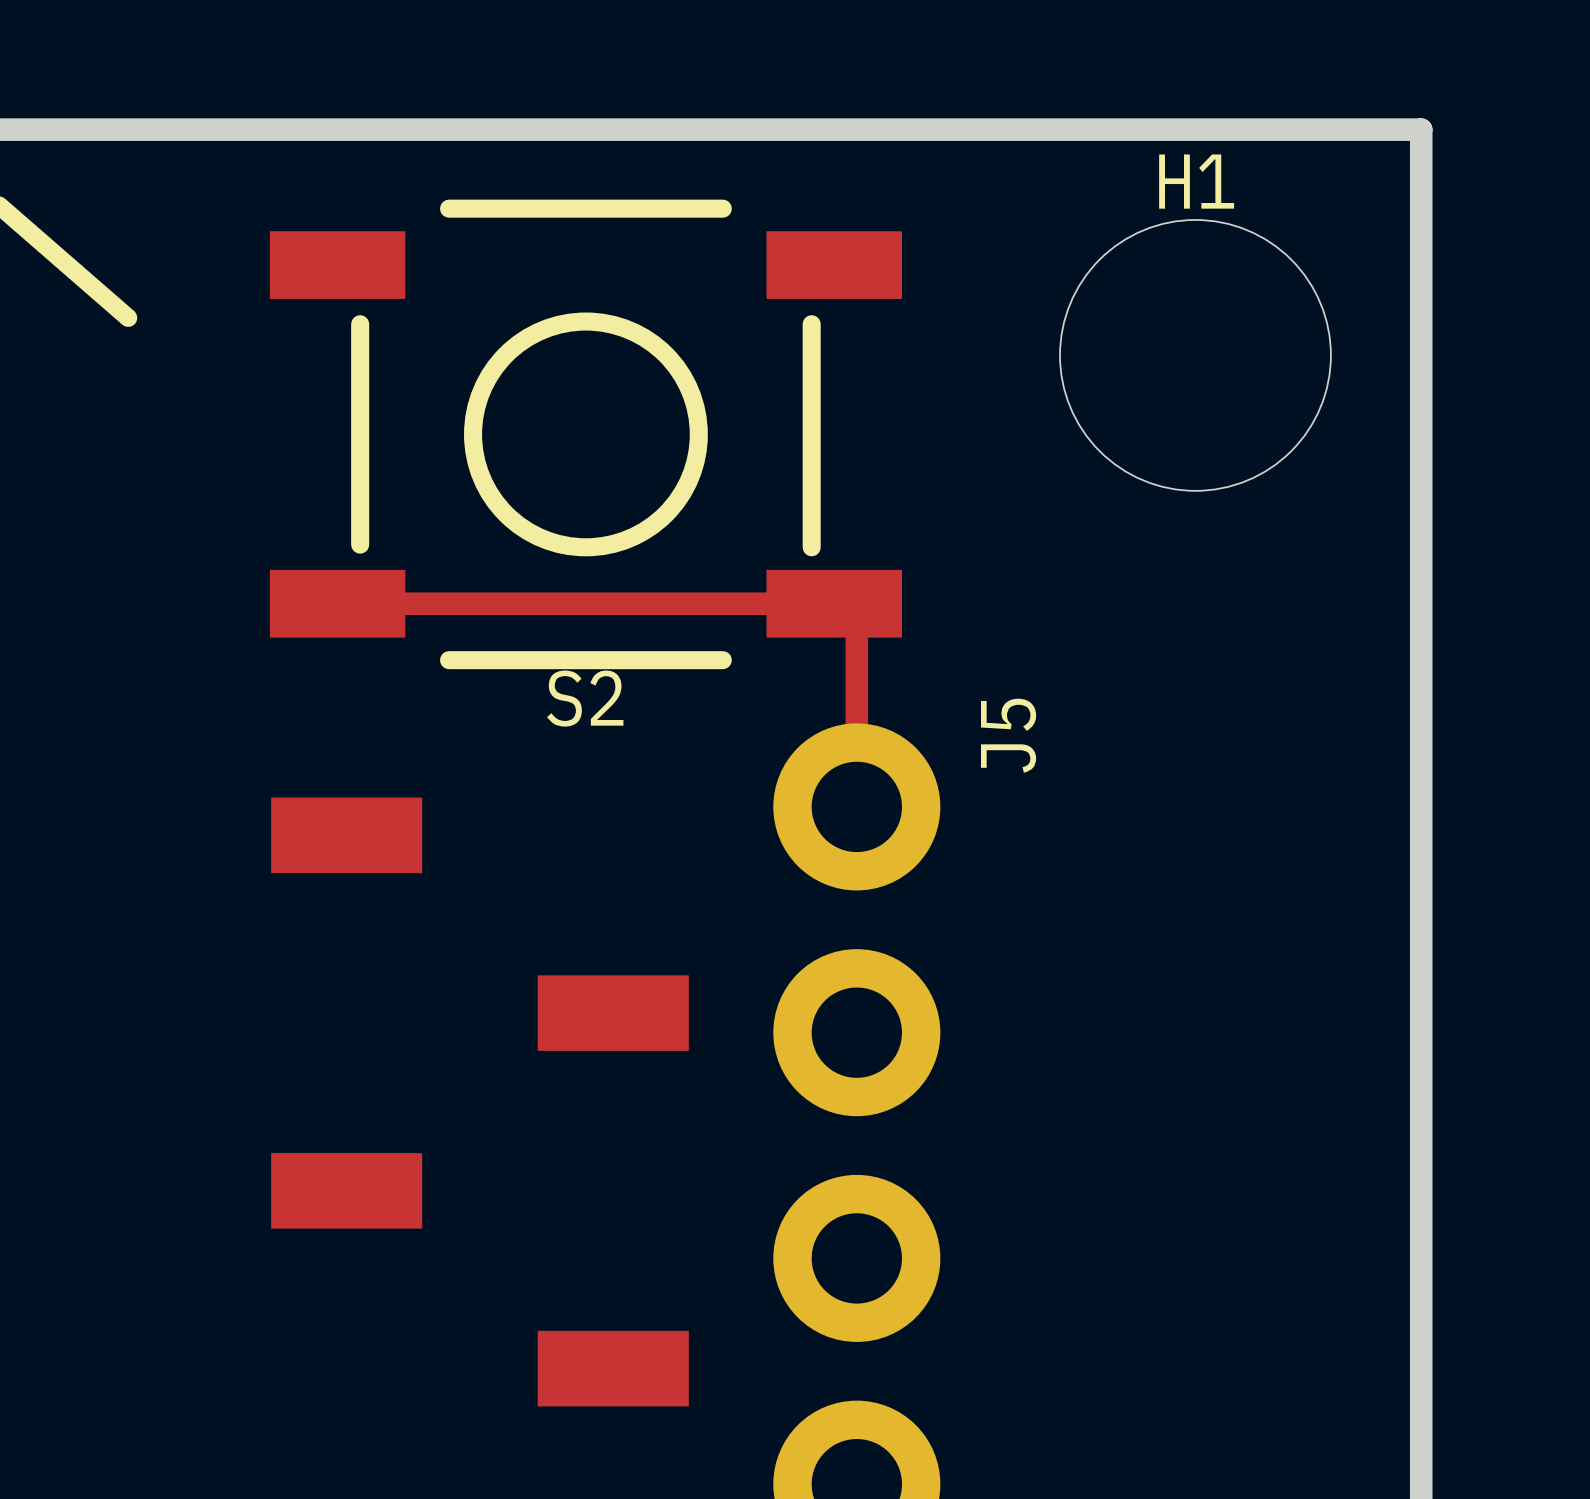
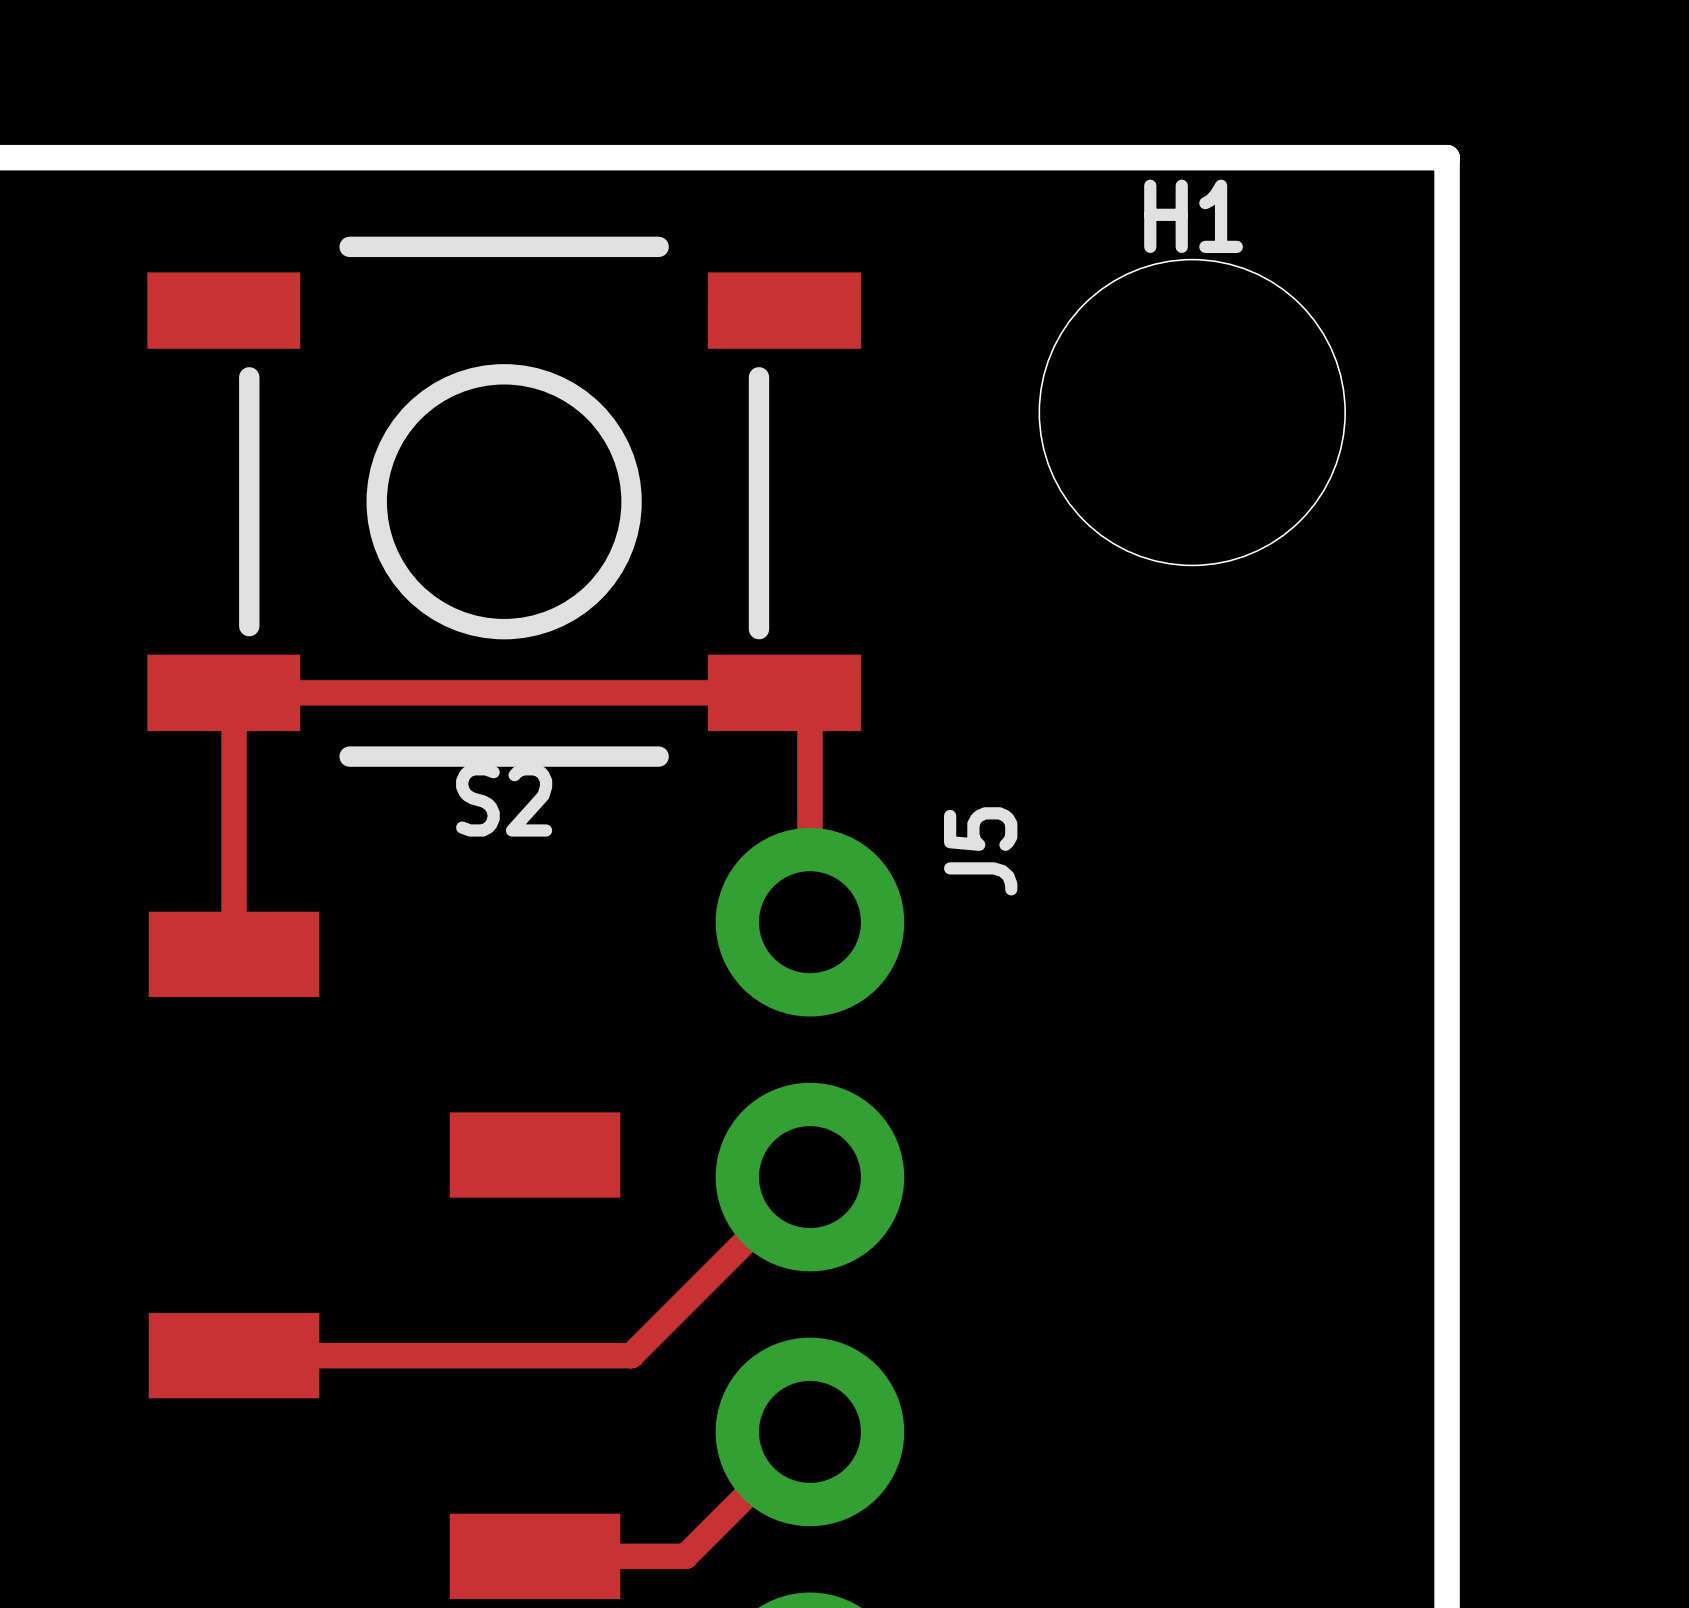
track: none -> (223, 692) (234, 703) (234, 954)
track: none -> (809, 1177) (631, 1355) (234, 1355)
track: none -> (809, 1431) (685, 1556) (535, 1556)

